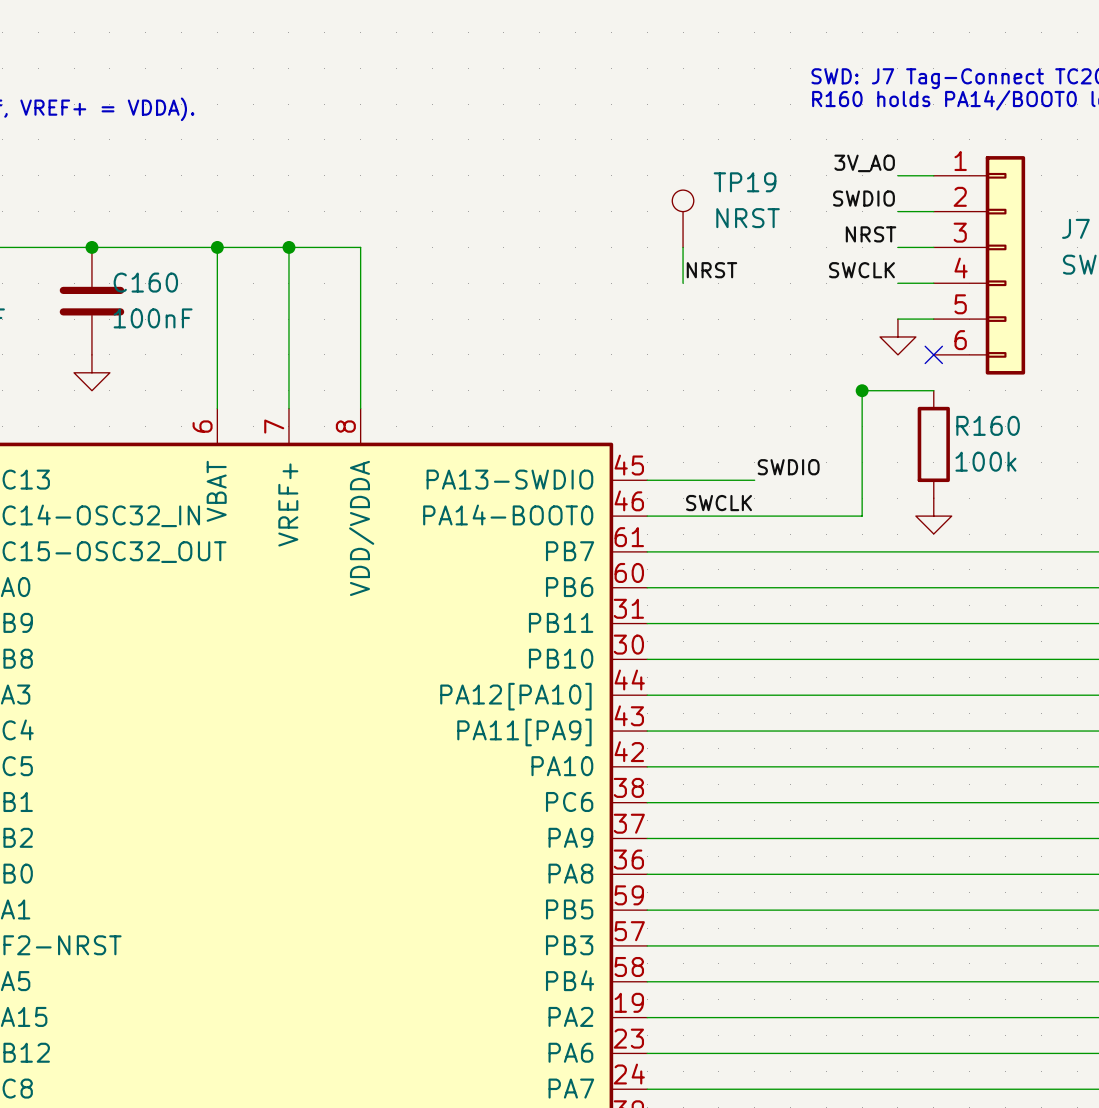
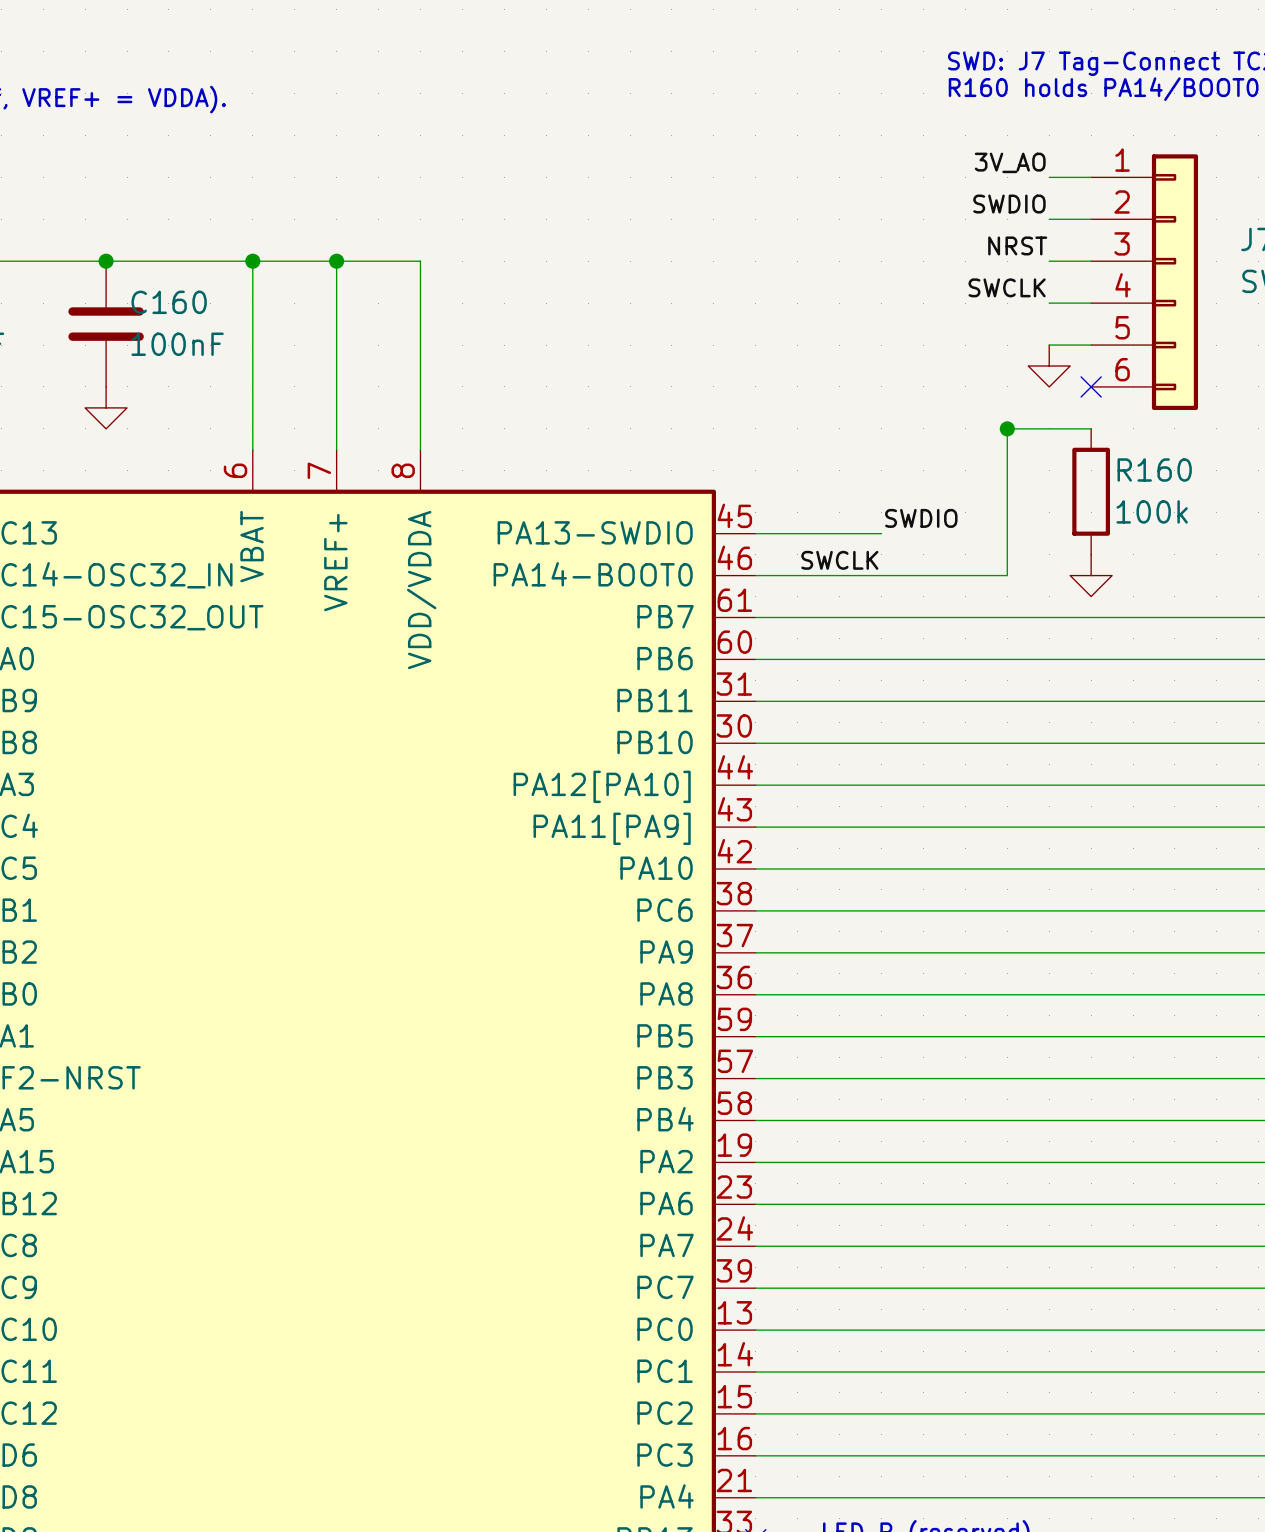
TP19: NRST (683, 218) -> none
wire: (683, 247) (683, 283) -> none
label: NRST (711, 270) -> none

